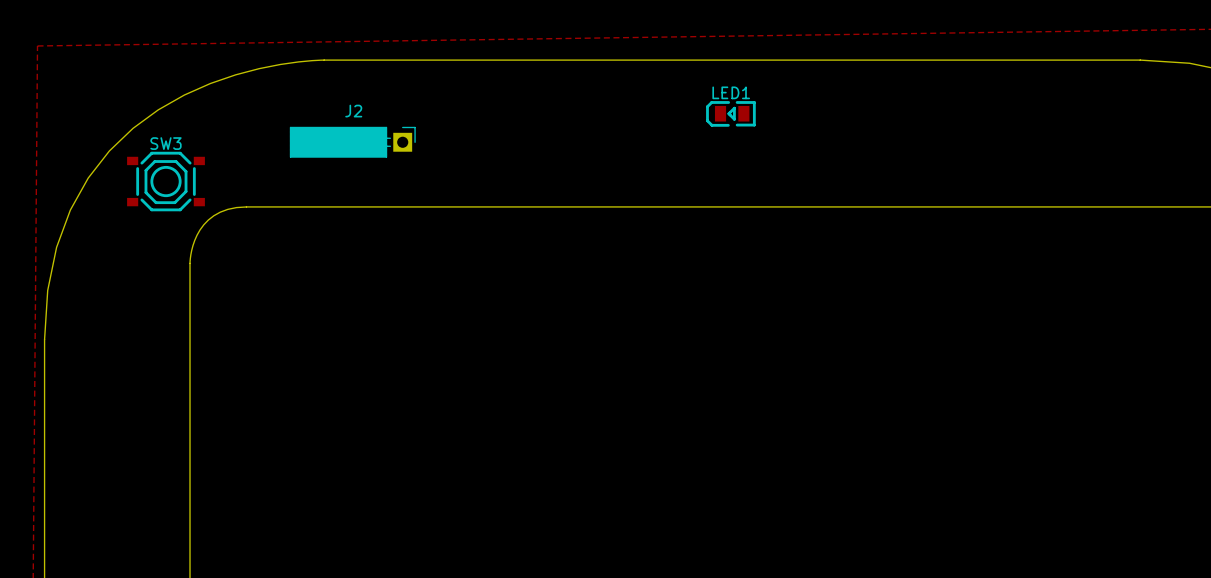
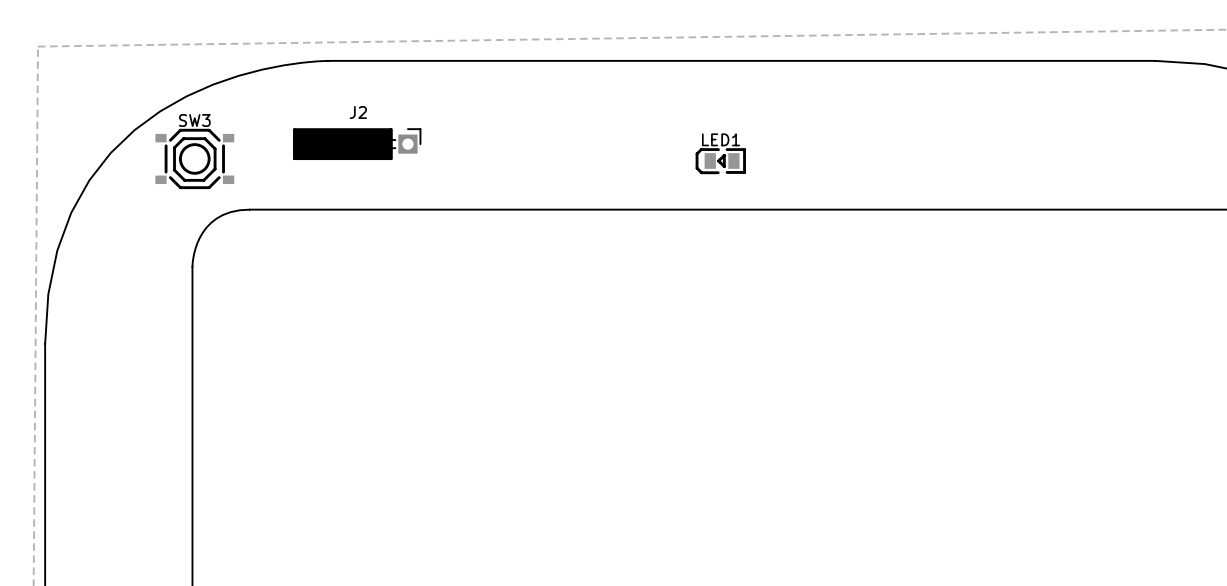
LED1 position: (730, 113) -> (720, 161)
SW3 position: (166, 181) -> (194, 158)

